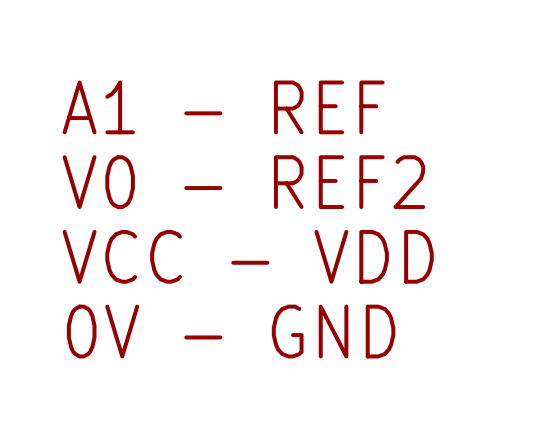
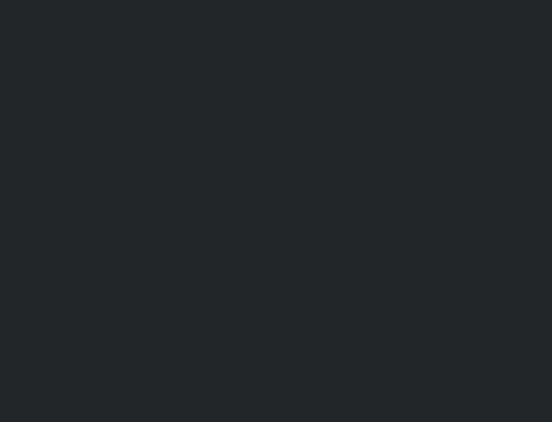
text: A1 - REF (223, 107) -> none
text: V0 - REF2 (243, 182) -> none
text: VCC - VDD (248, 256) -> none
text: 0V - GND (231, 331) -> none

